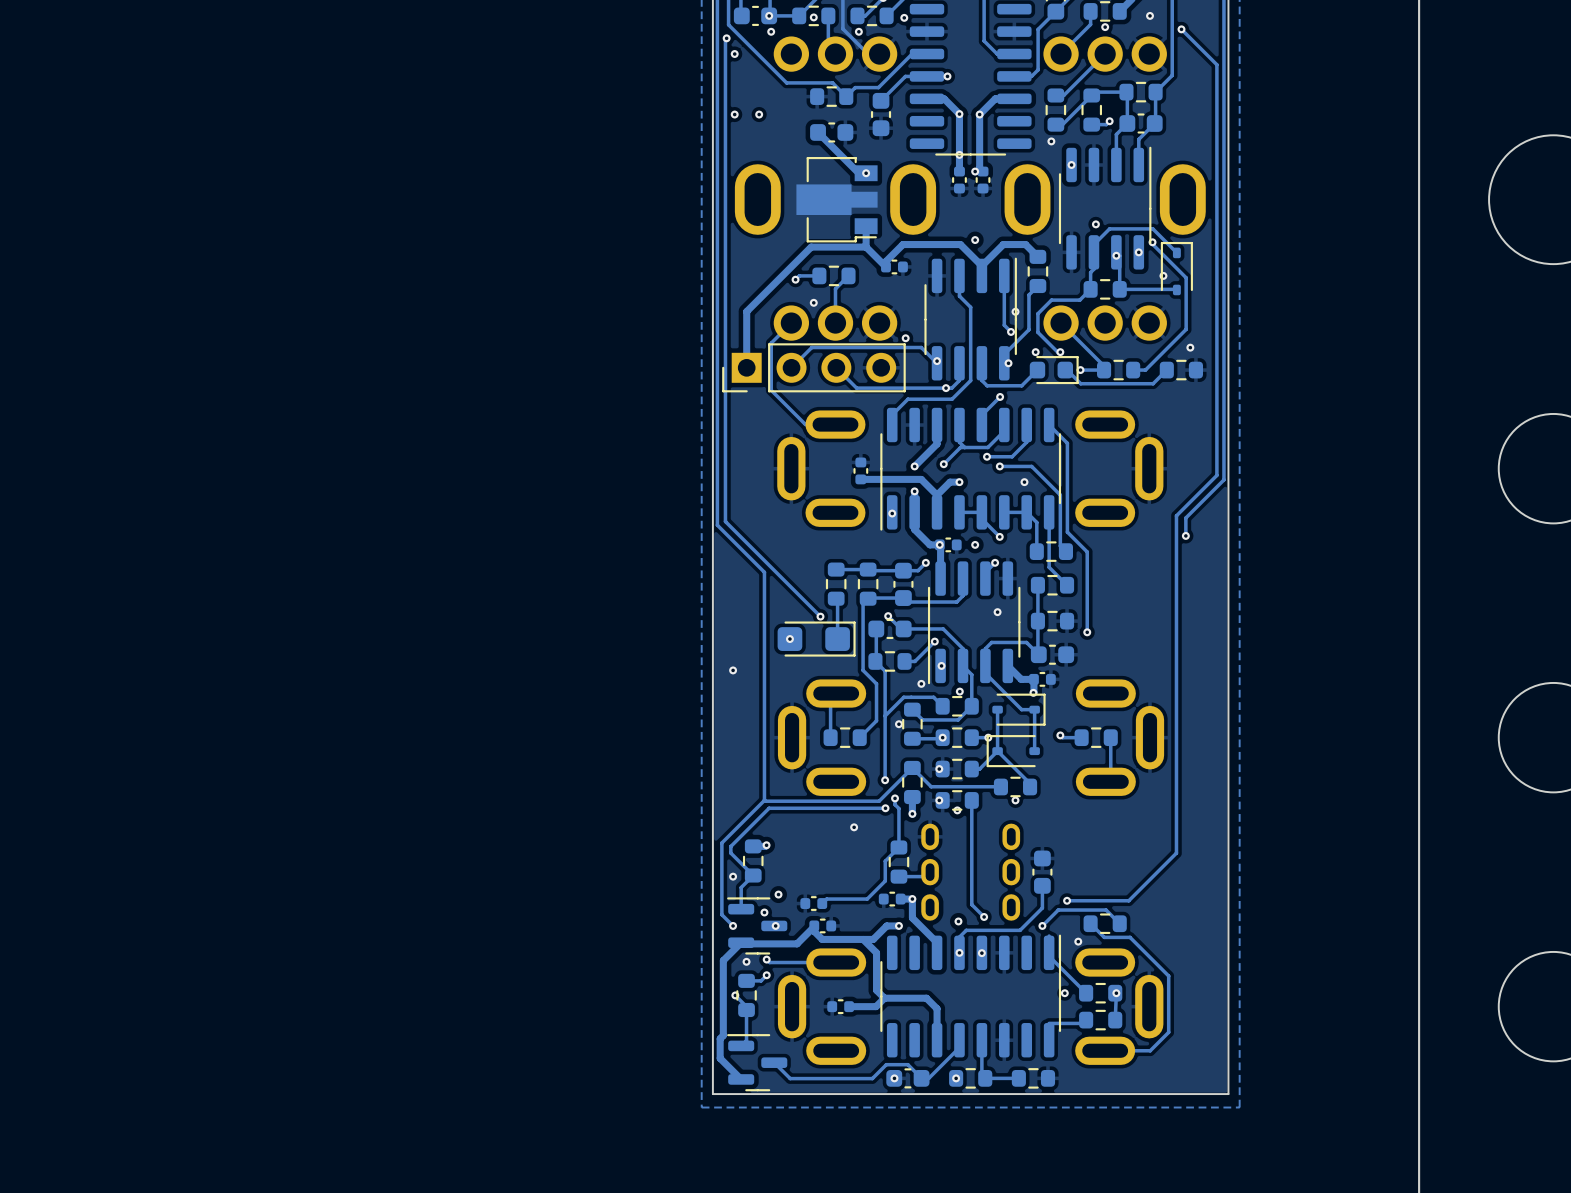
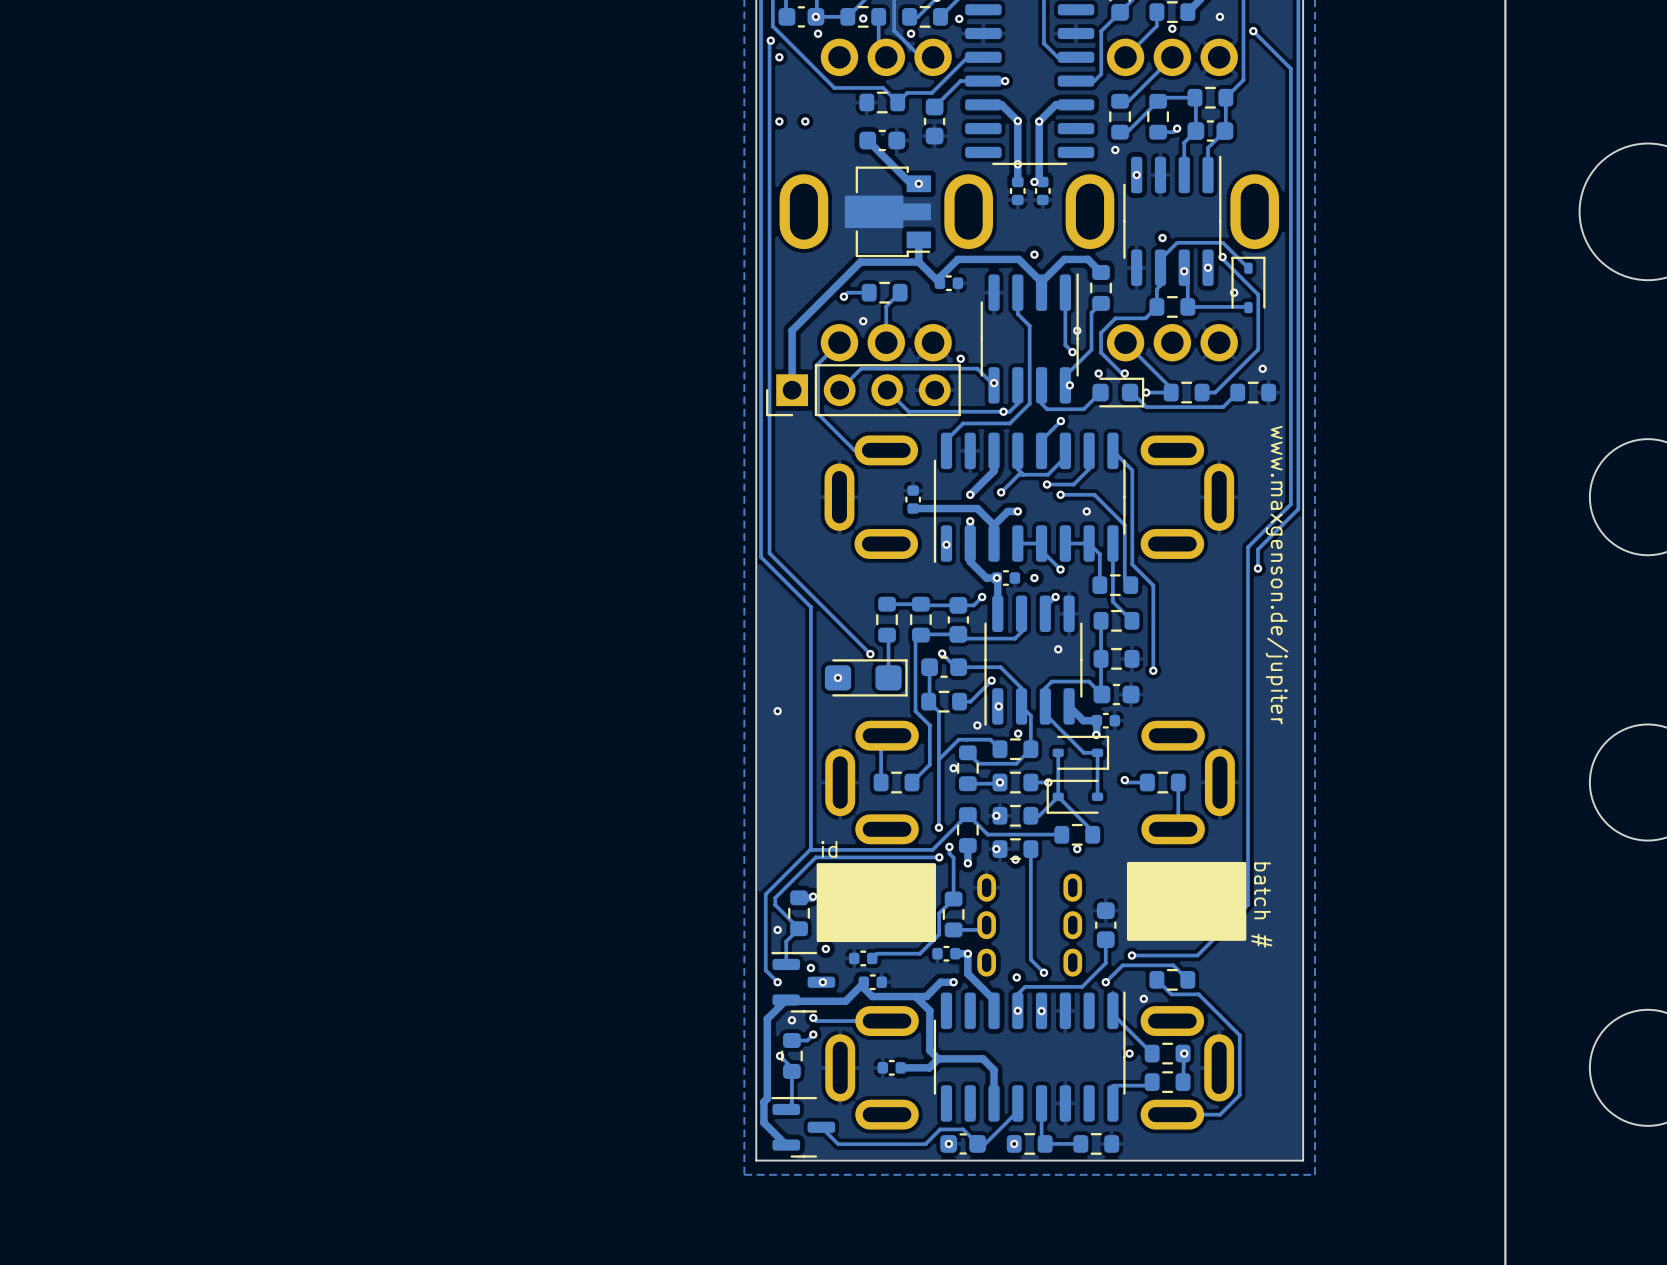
text: none -> www.maxgenson.de/jupiter (1277, 575)
text: none -> id (829, 849)
drawing: none -> [1126, 861, 1247, 941]
drawing: none -> [816, 863, 936, 943]
text: none -> batch # (1261, 905)

